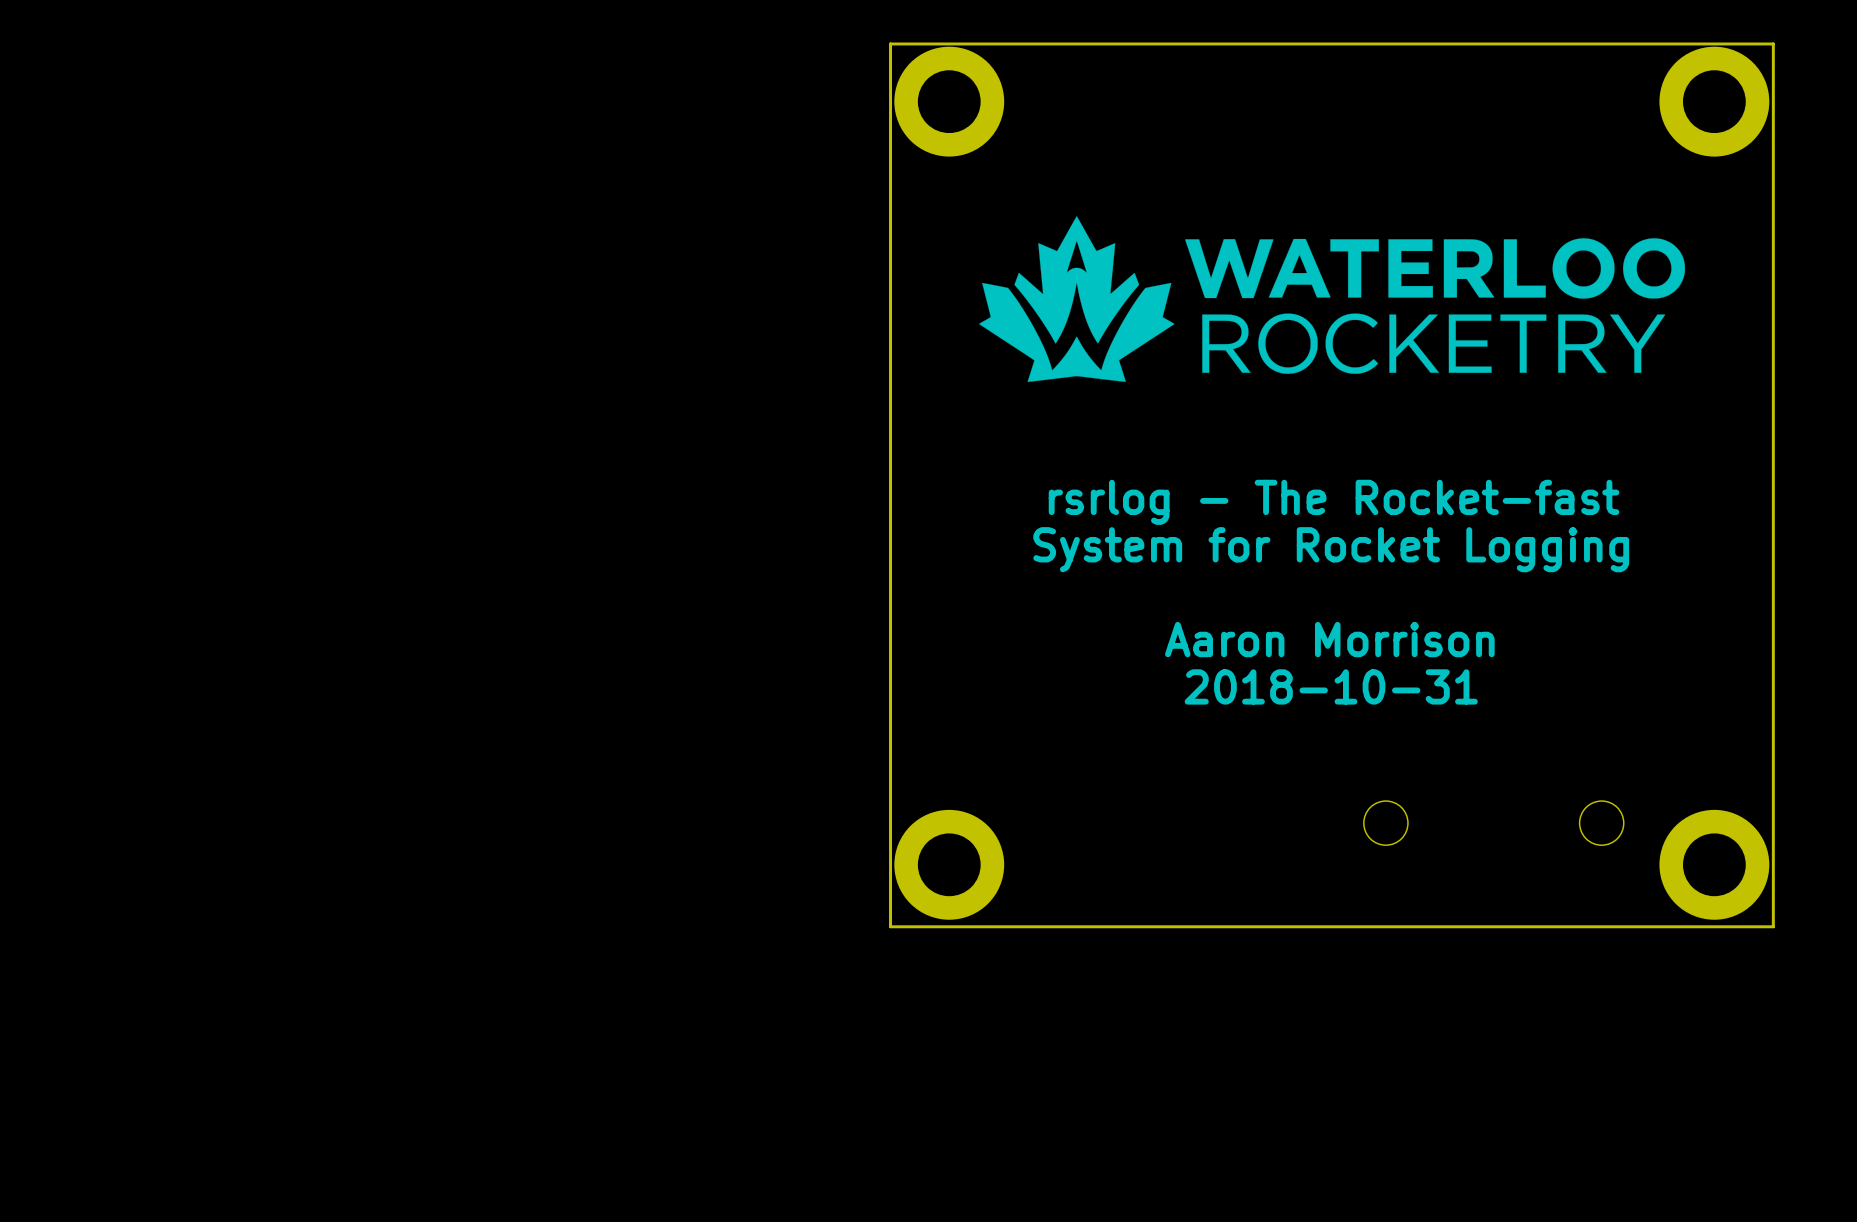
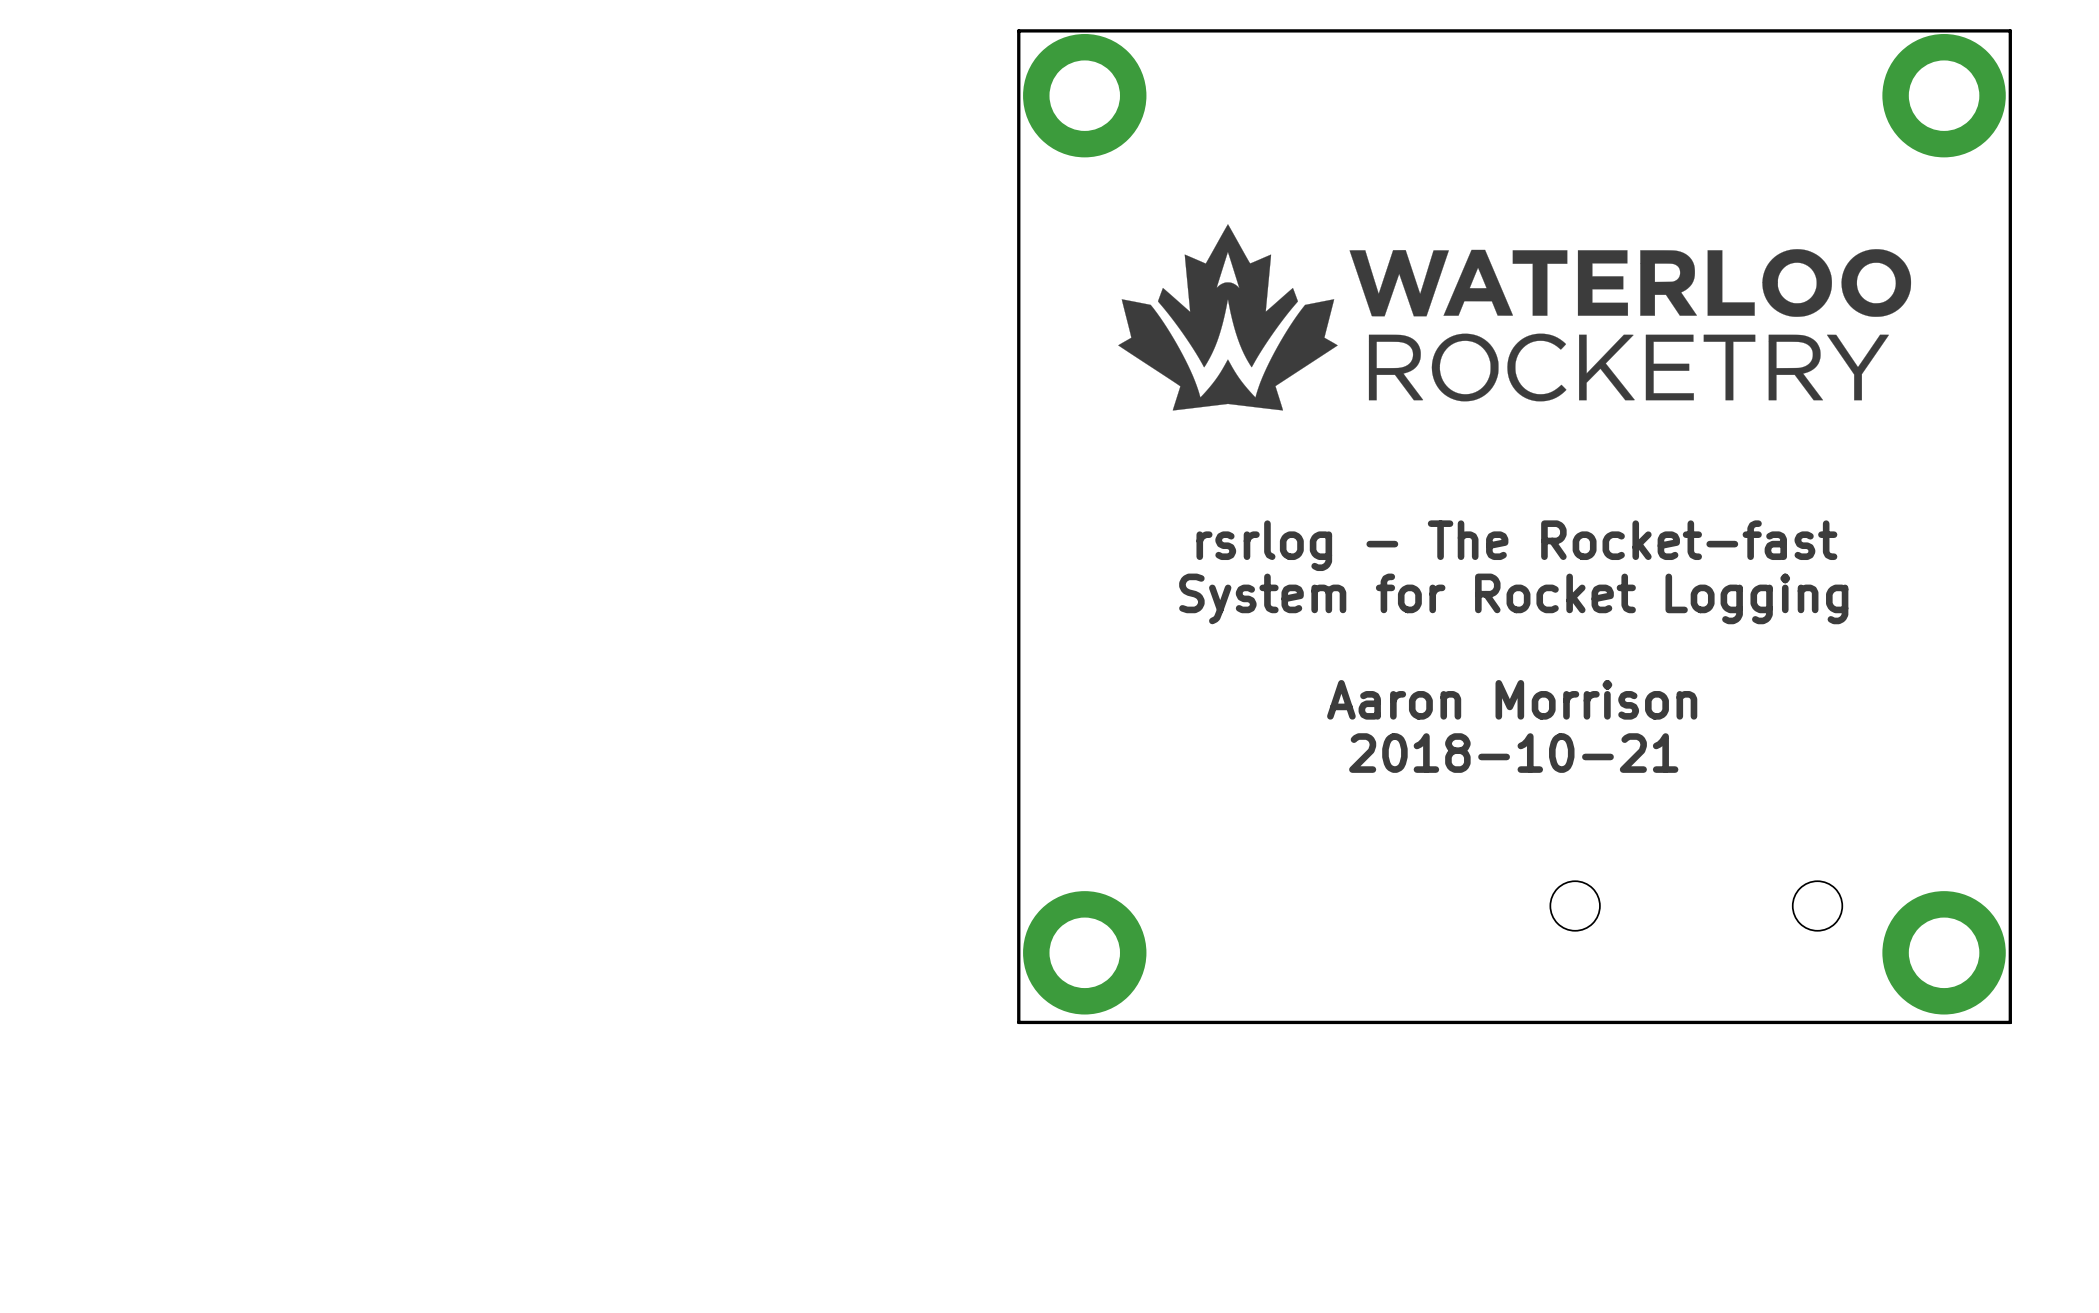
text: 2018-10-31 (1331, 686) -> 2018-10-21 (1513, 753)

